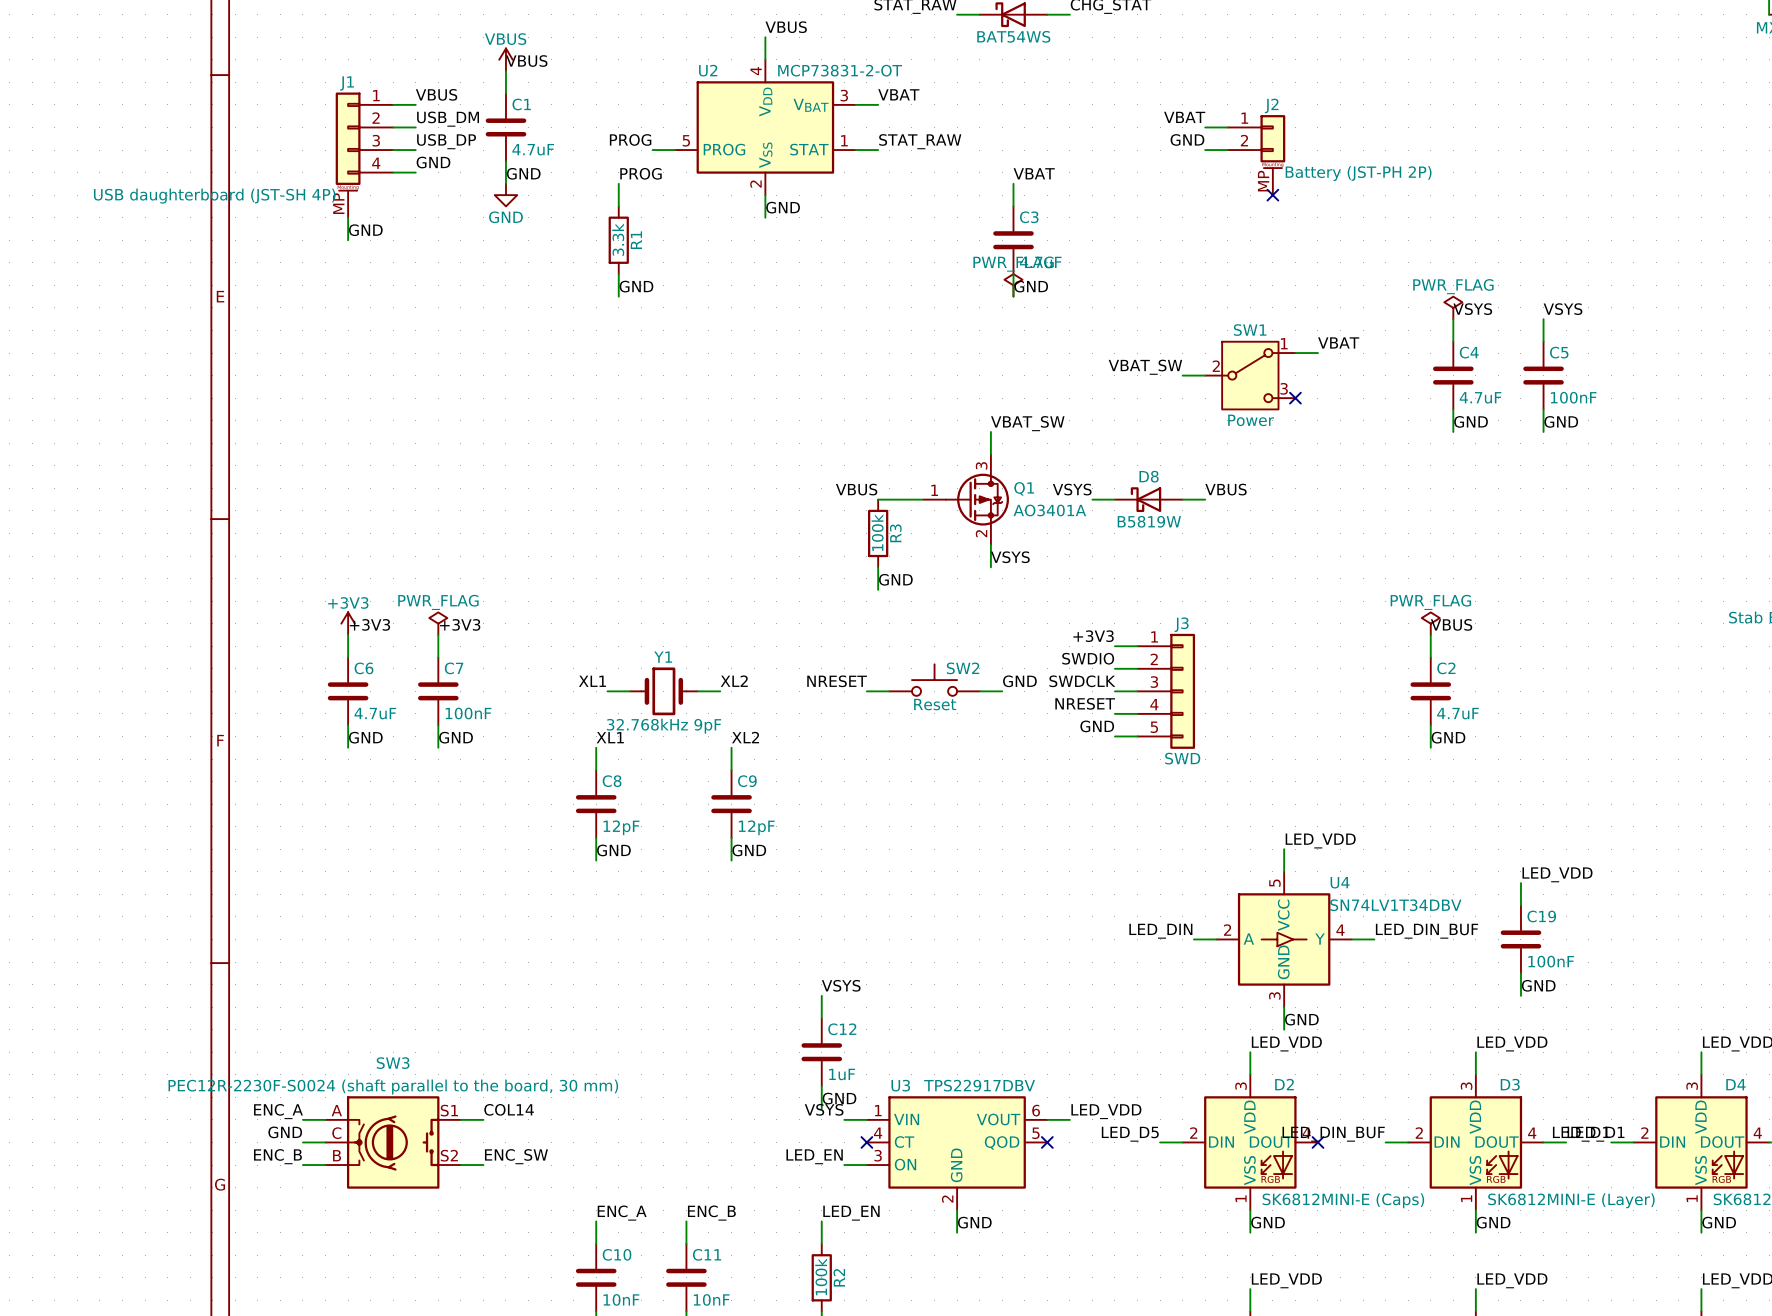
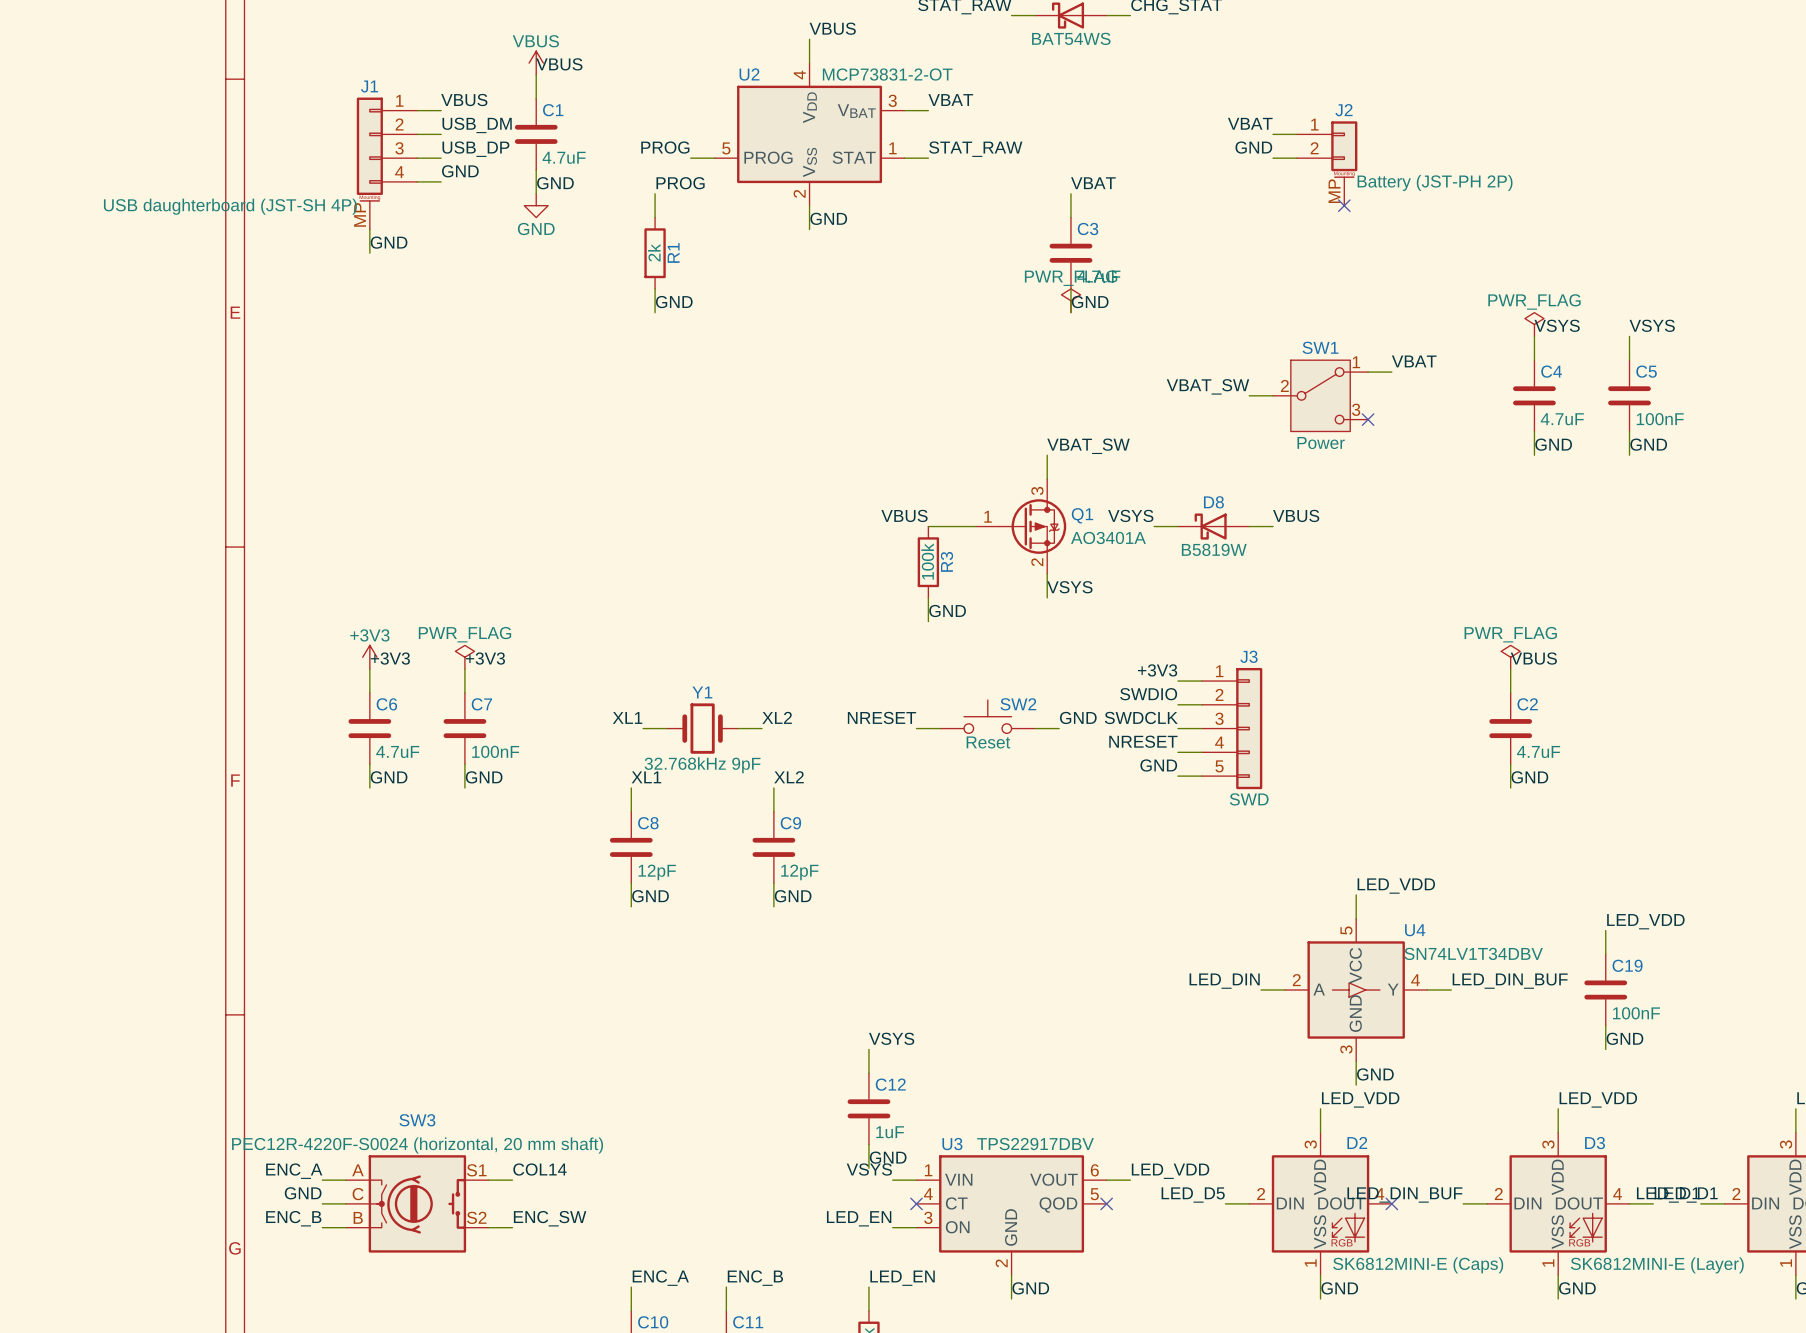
R1 value: 3.3k (618, 239) -> 2k (654, 252)
SW3 value: PEC12R-2230F-S0024 (shaft parallel to the board, 30 mm) (393, 1087) -> PEC12R-4220F-S0024 (horizontal, 20 mm shaft) (417, 1145)

